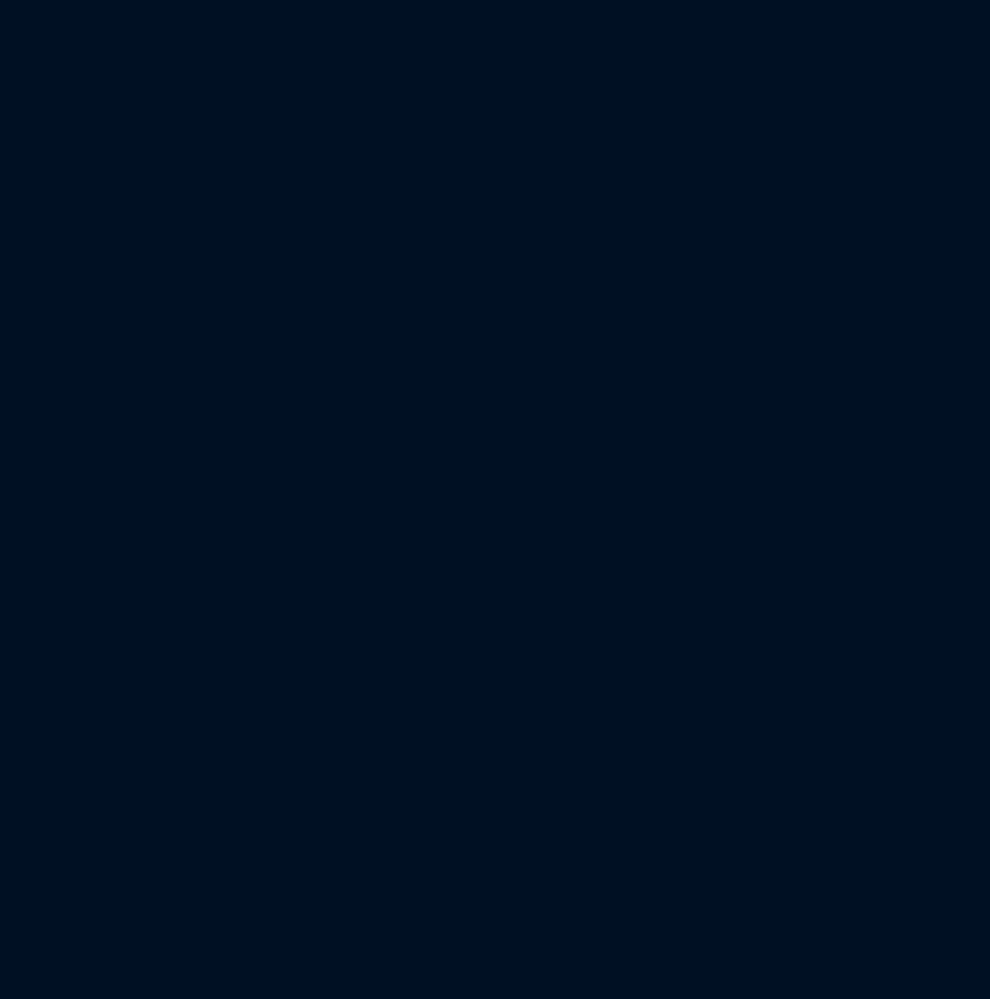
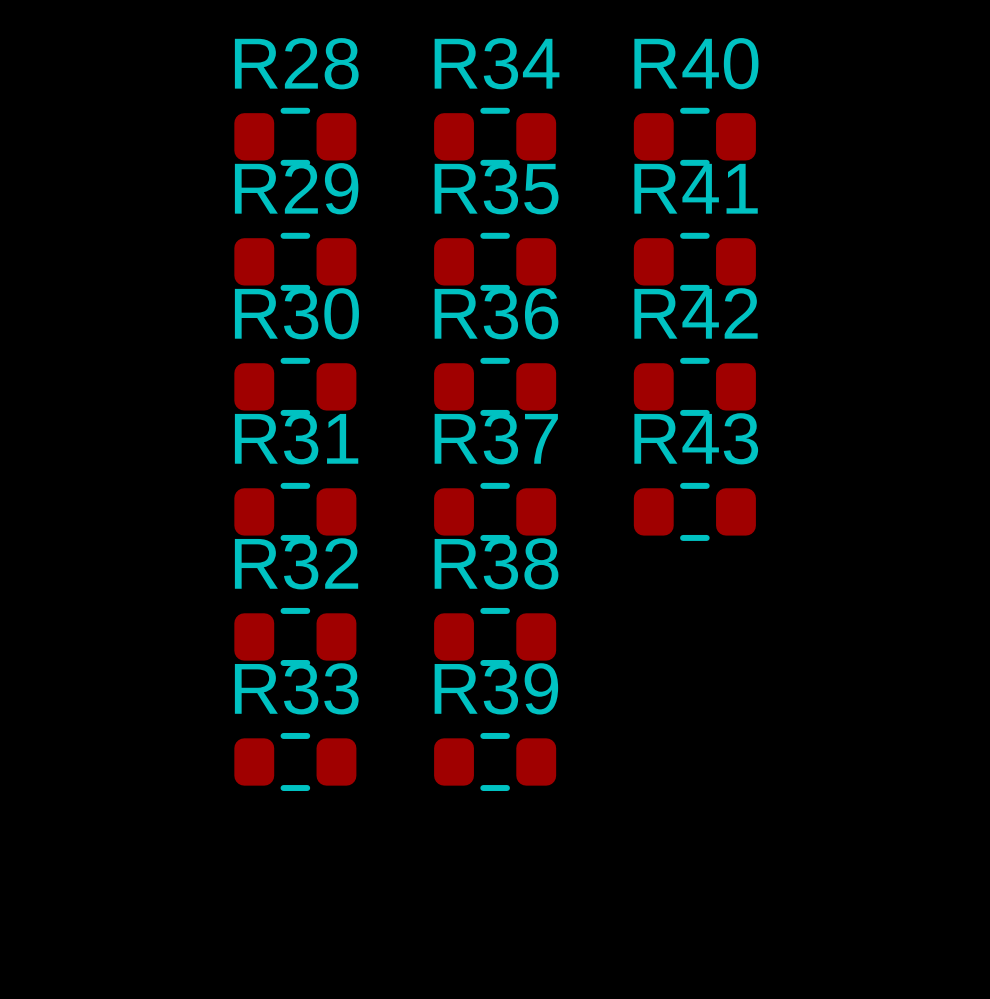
R28: none -> (295, 136)
R34: none -> (495, 136)
R40: none -> (694, 136)
R29: none -> (295, 261)
R35: none -> (495, 261)
R41: none -> (694, 261)
R30: none -> (295, 386)
R36: none -> (495, 386)
R42: none -> (694, 386)
R31: none -> (295, 511)
R37: none -> (495, 511)
R43: none -> (694, 511)
R32: none -> (295, 636)
R38: none -> (495, 636)
R33: none -> (295, 761)
R39: none -> (495, 761)

